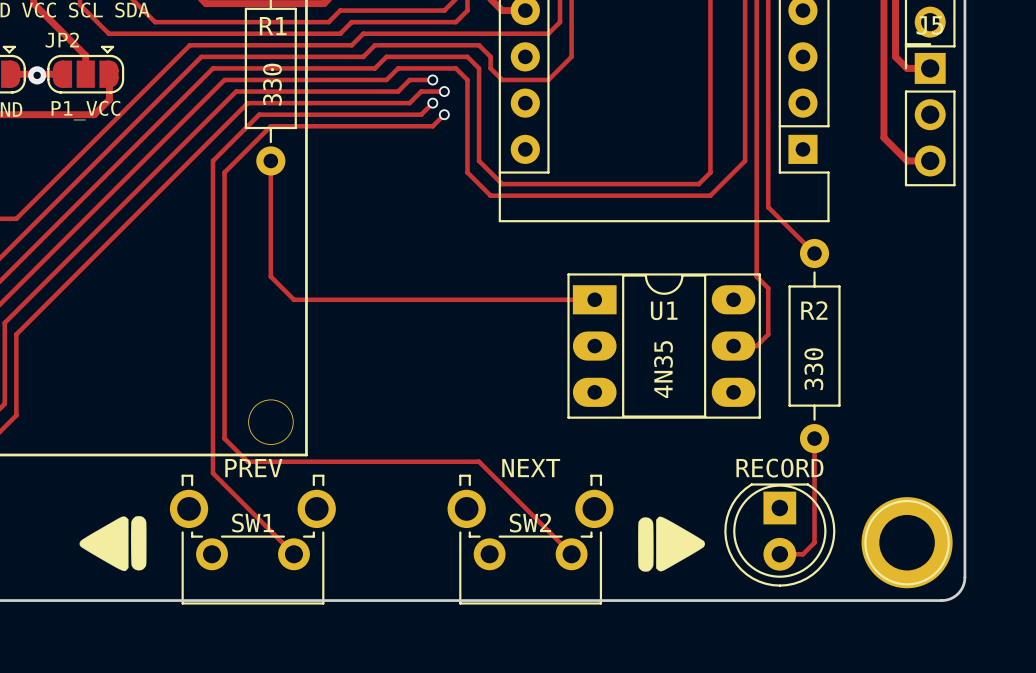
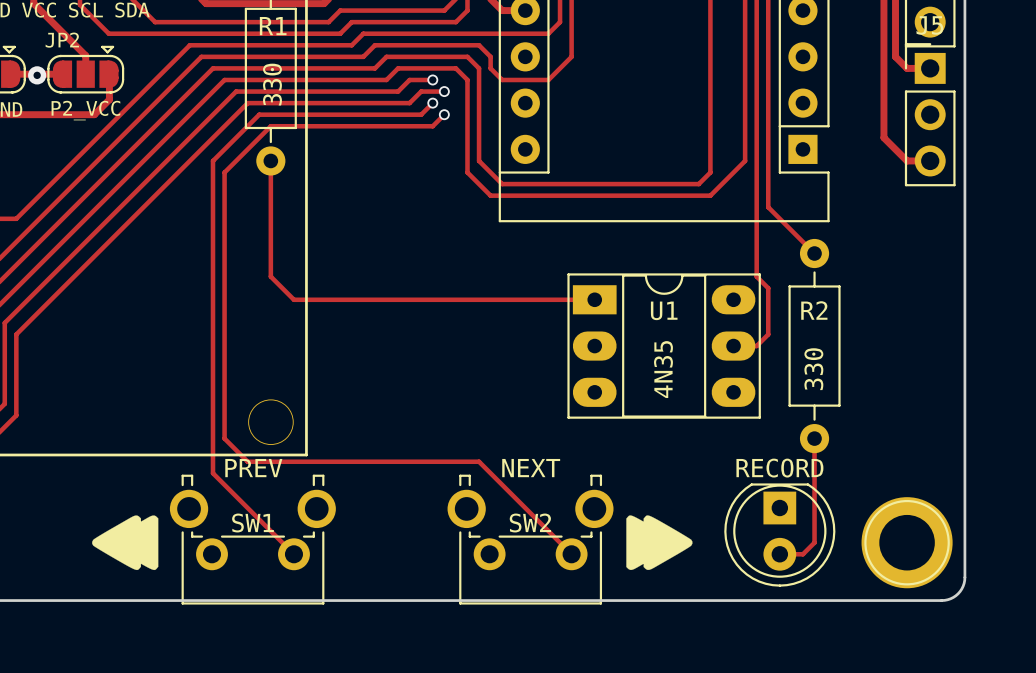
JP2 value: P1_VCC (85, 110) -> P2_VCC (85, 110)
drawing shape: [79, 516, 147, 572] -> [92, 515, 159, 571]
drawing shape: [638, 516, 705, 572] -> [626, 515, 693, 570]

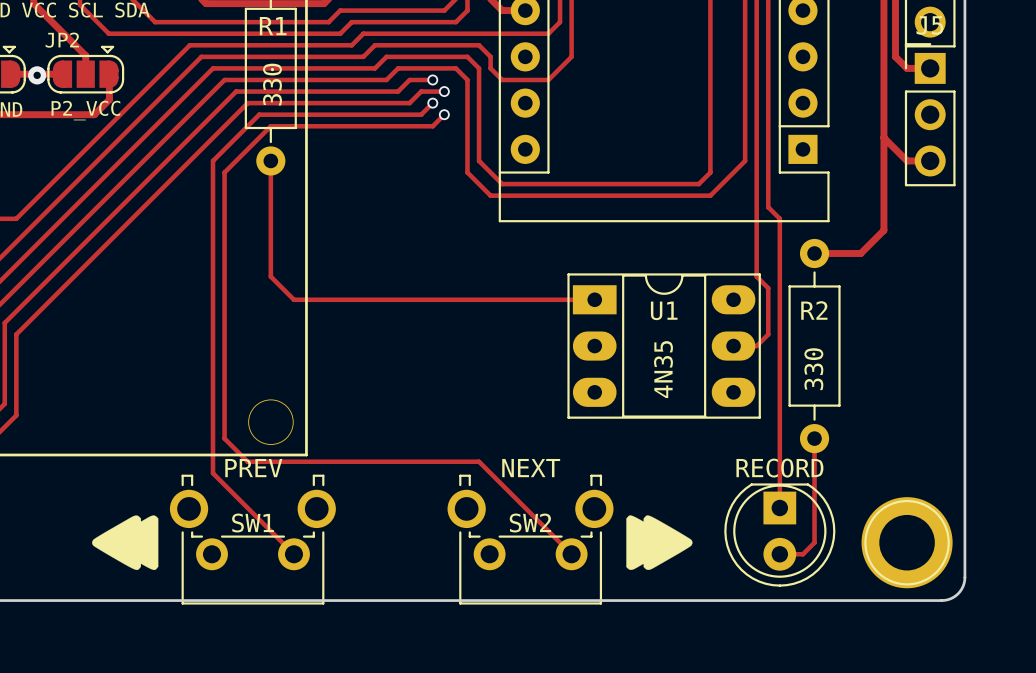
track: (779, 218) (814, 253) -> (883, 137) (883, 230) (860, 253) (814, 253)
track: none -> (779, 218) (779, 508)

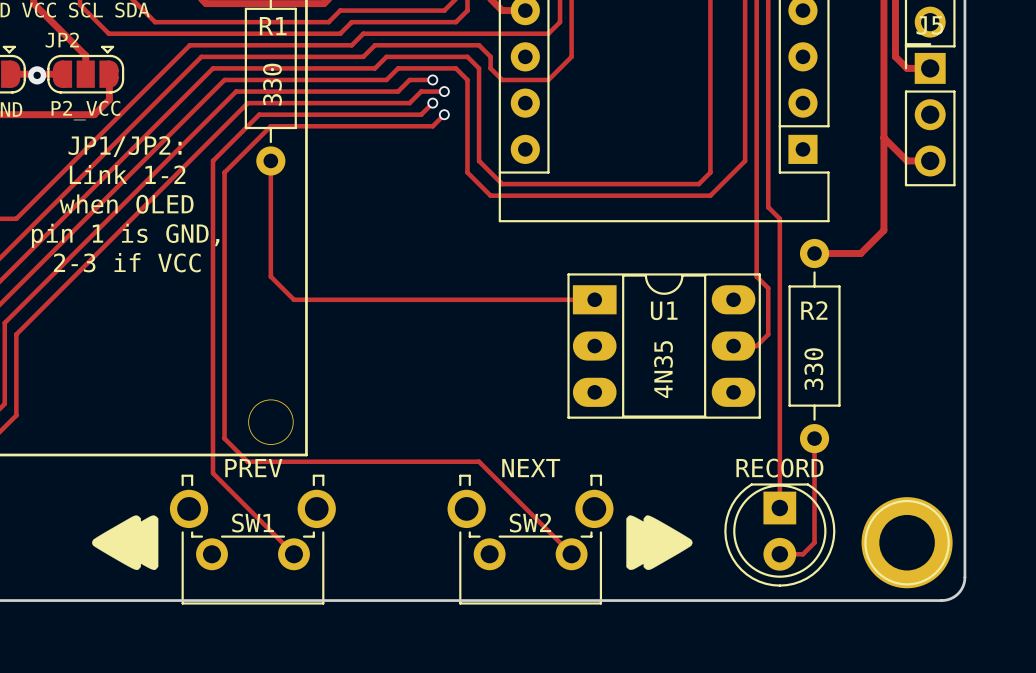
text: none -> JP1/JP2: (125, 146)
text: none -> Link 1-2 (127, 174)
text: none -> when OLED (126, 204)
text: none -> pin 1 is GND, (125, 235)
text: none -> 2-3 if VCC (127, 262)

